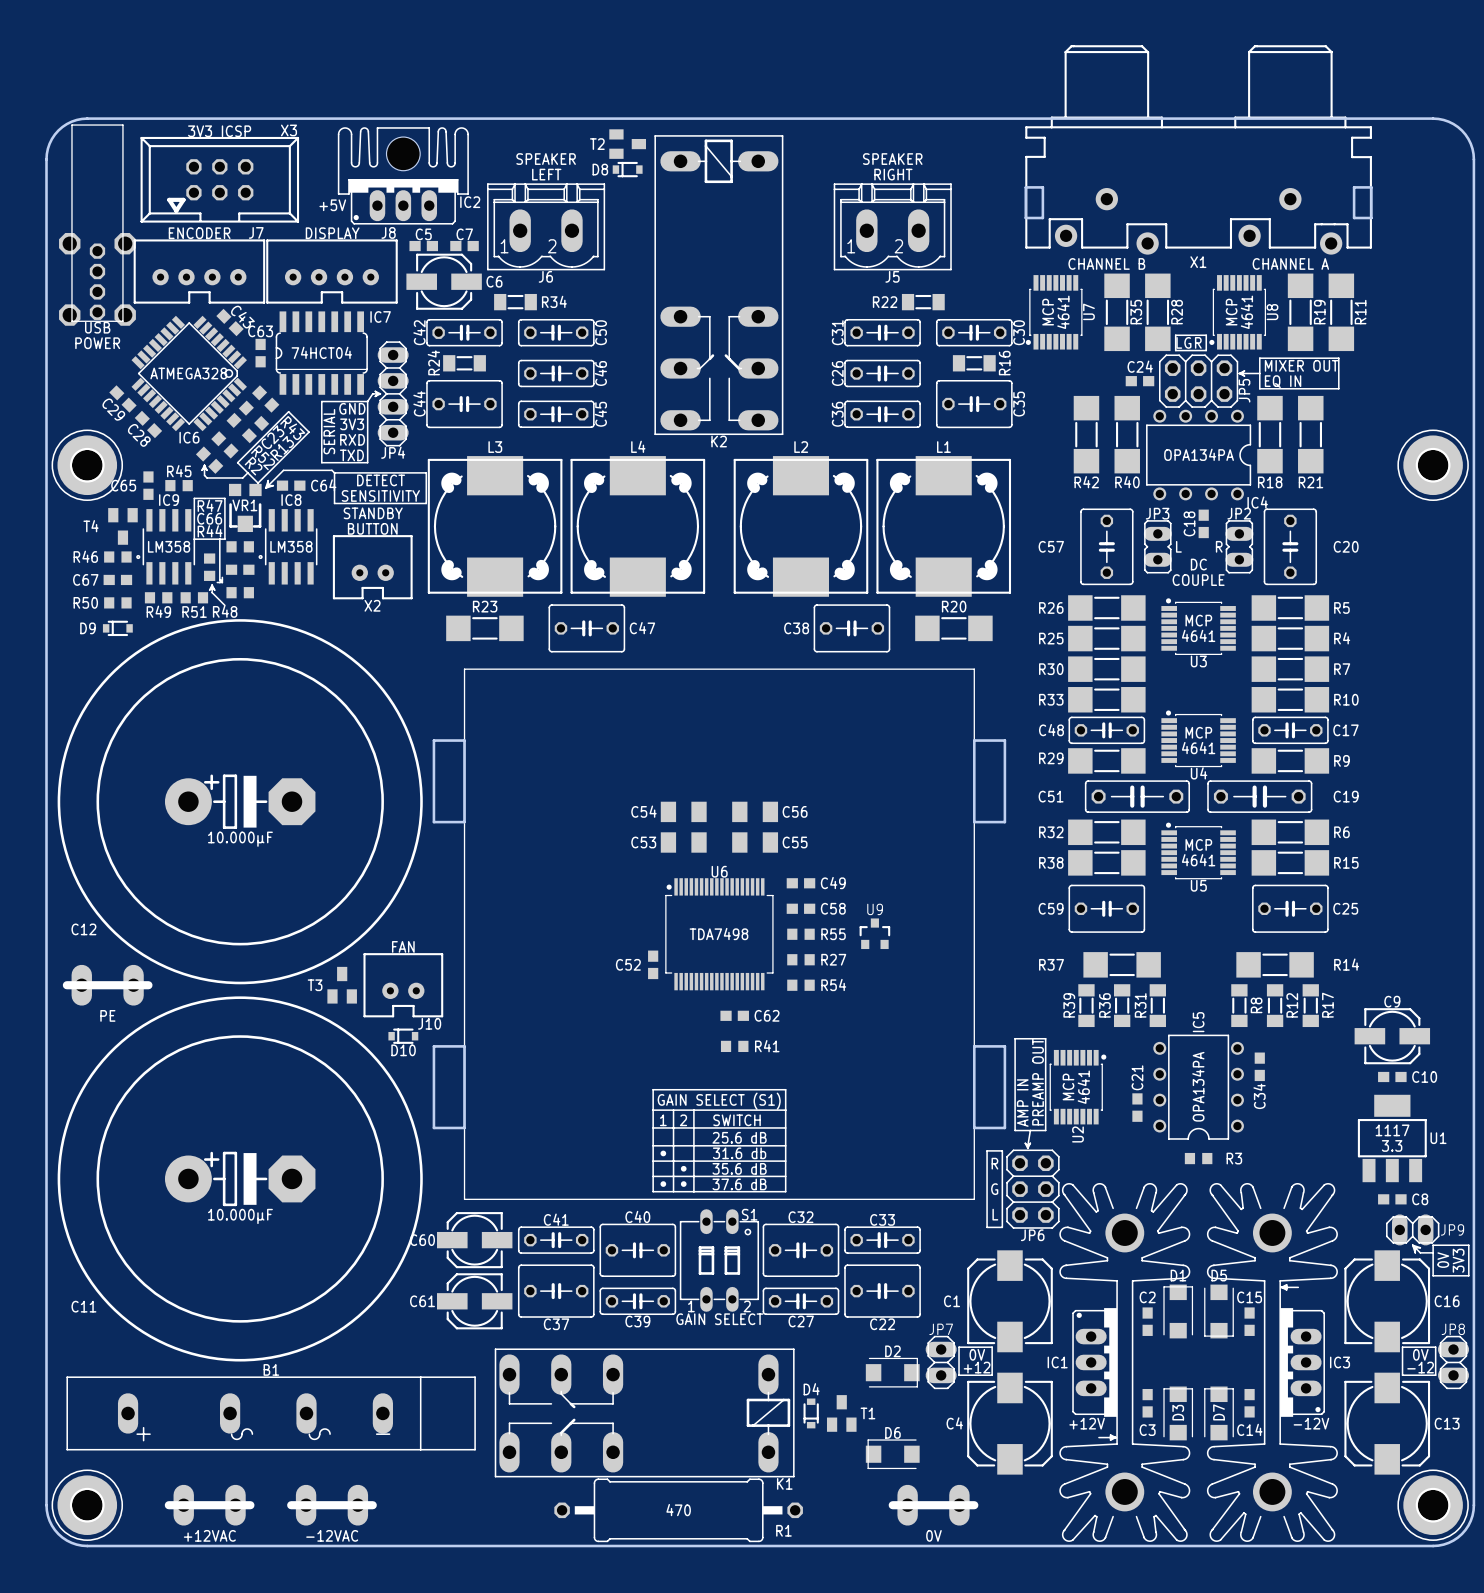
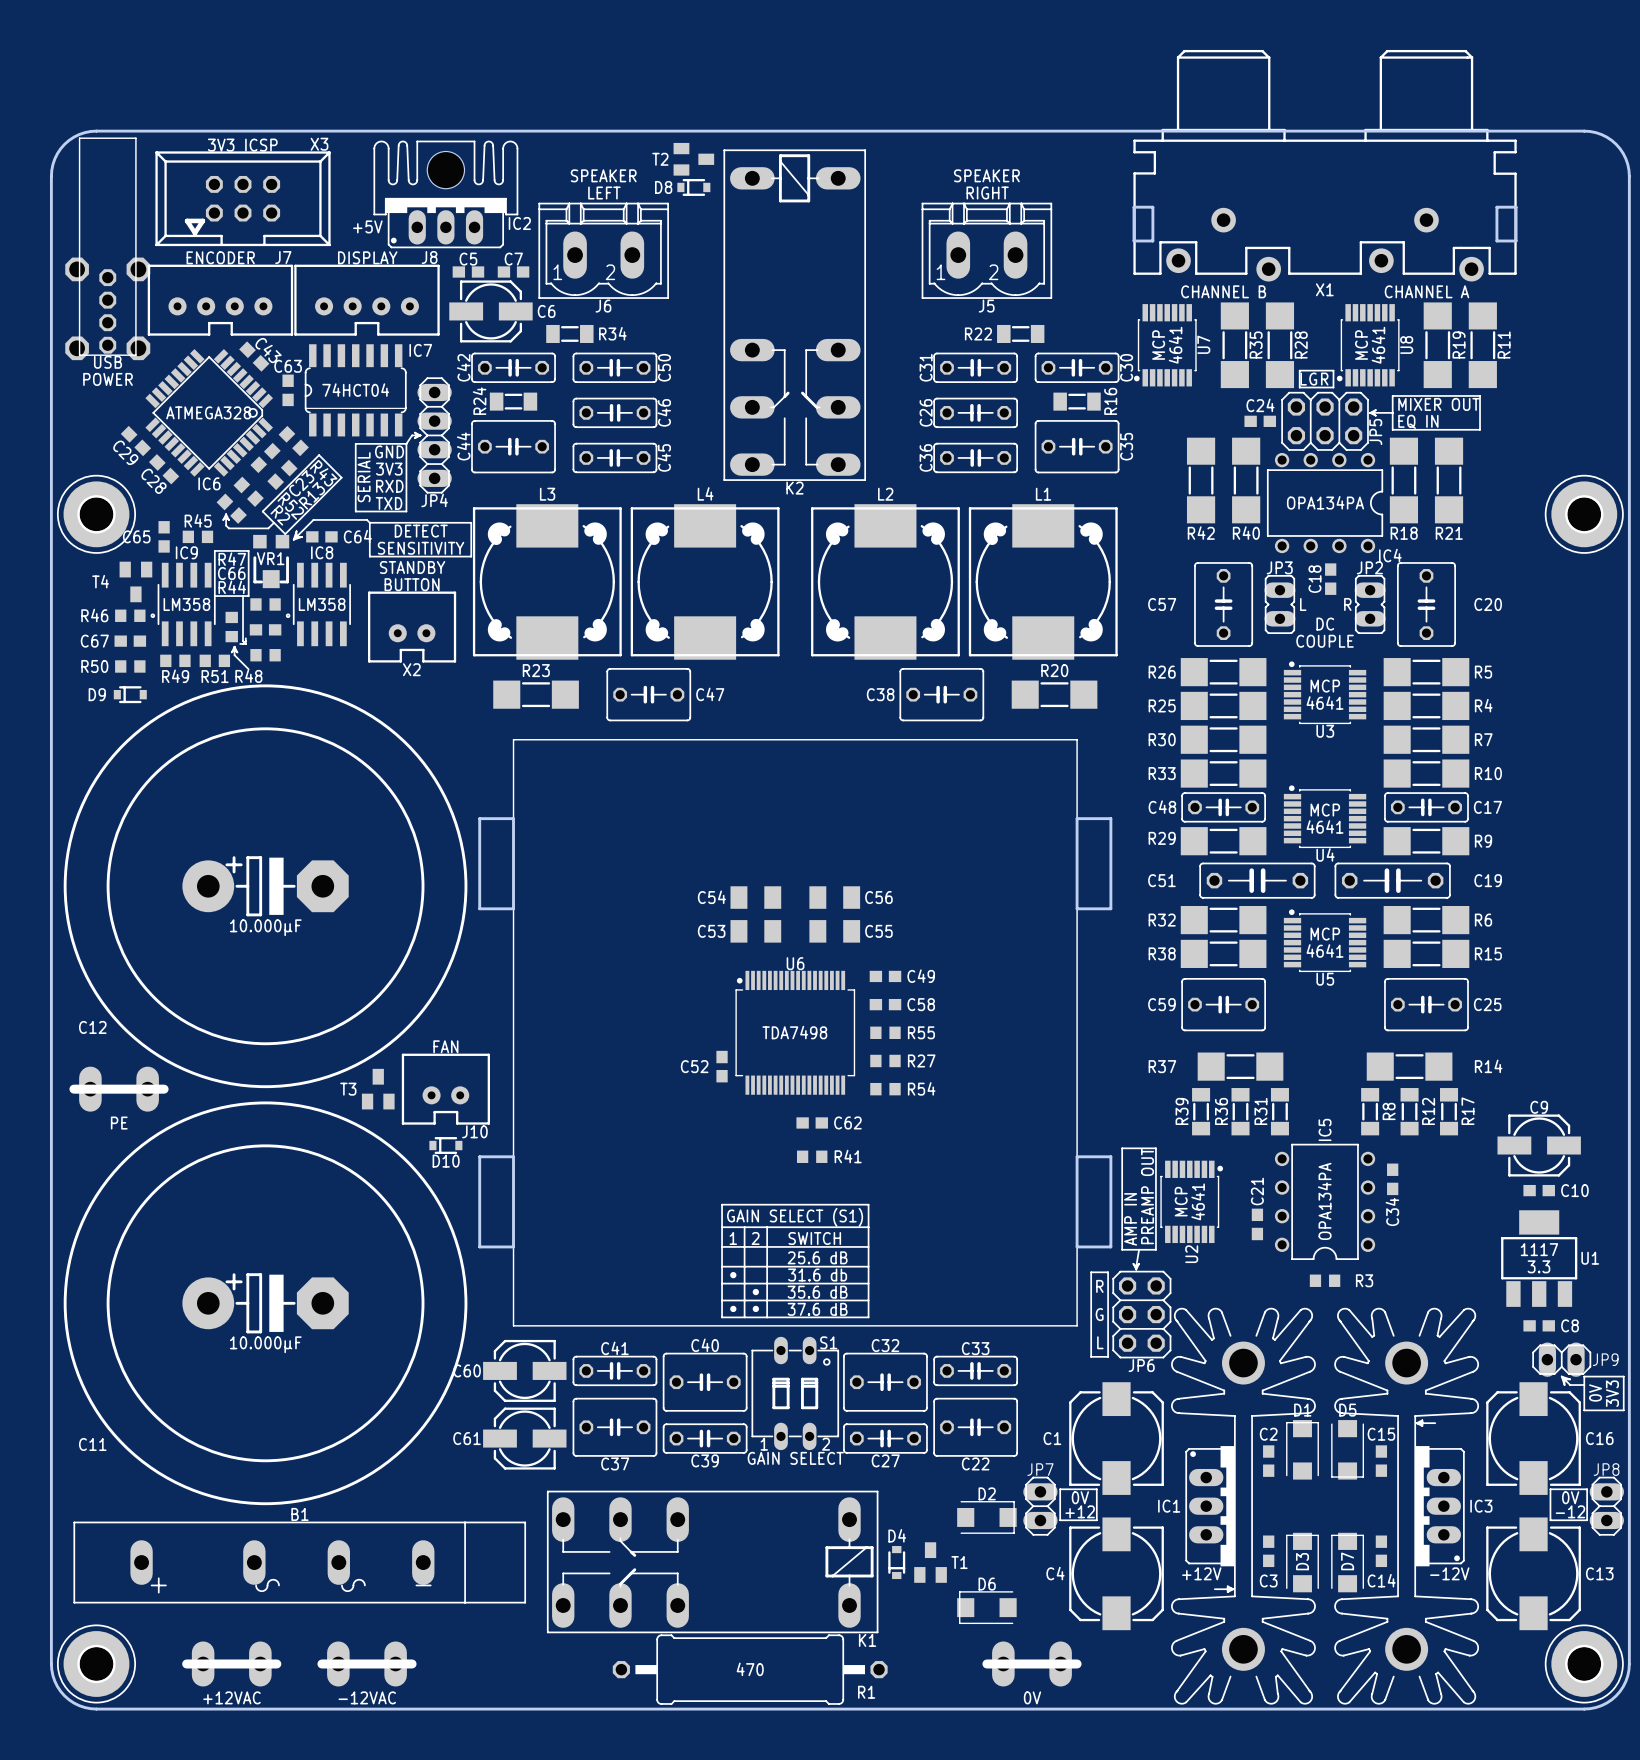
U9: (874, 933) -> none

